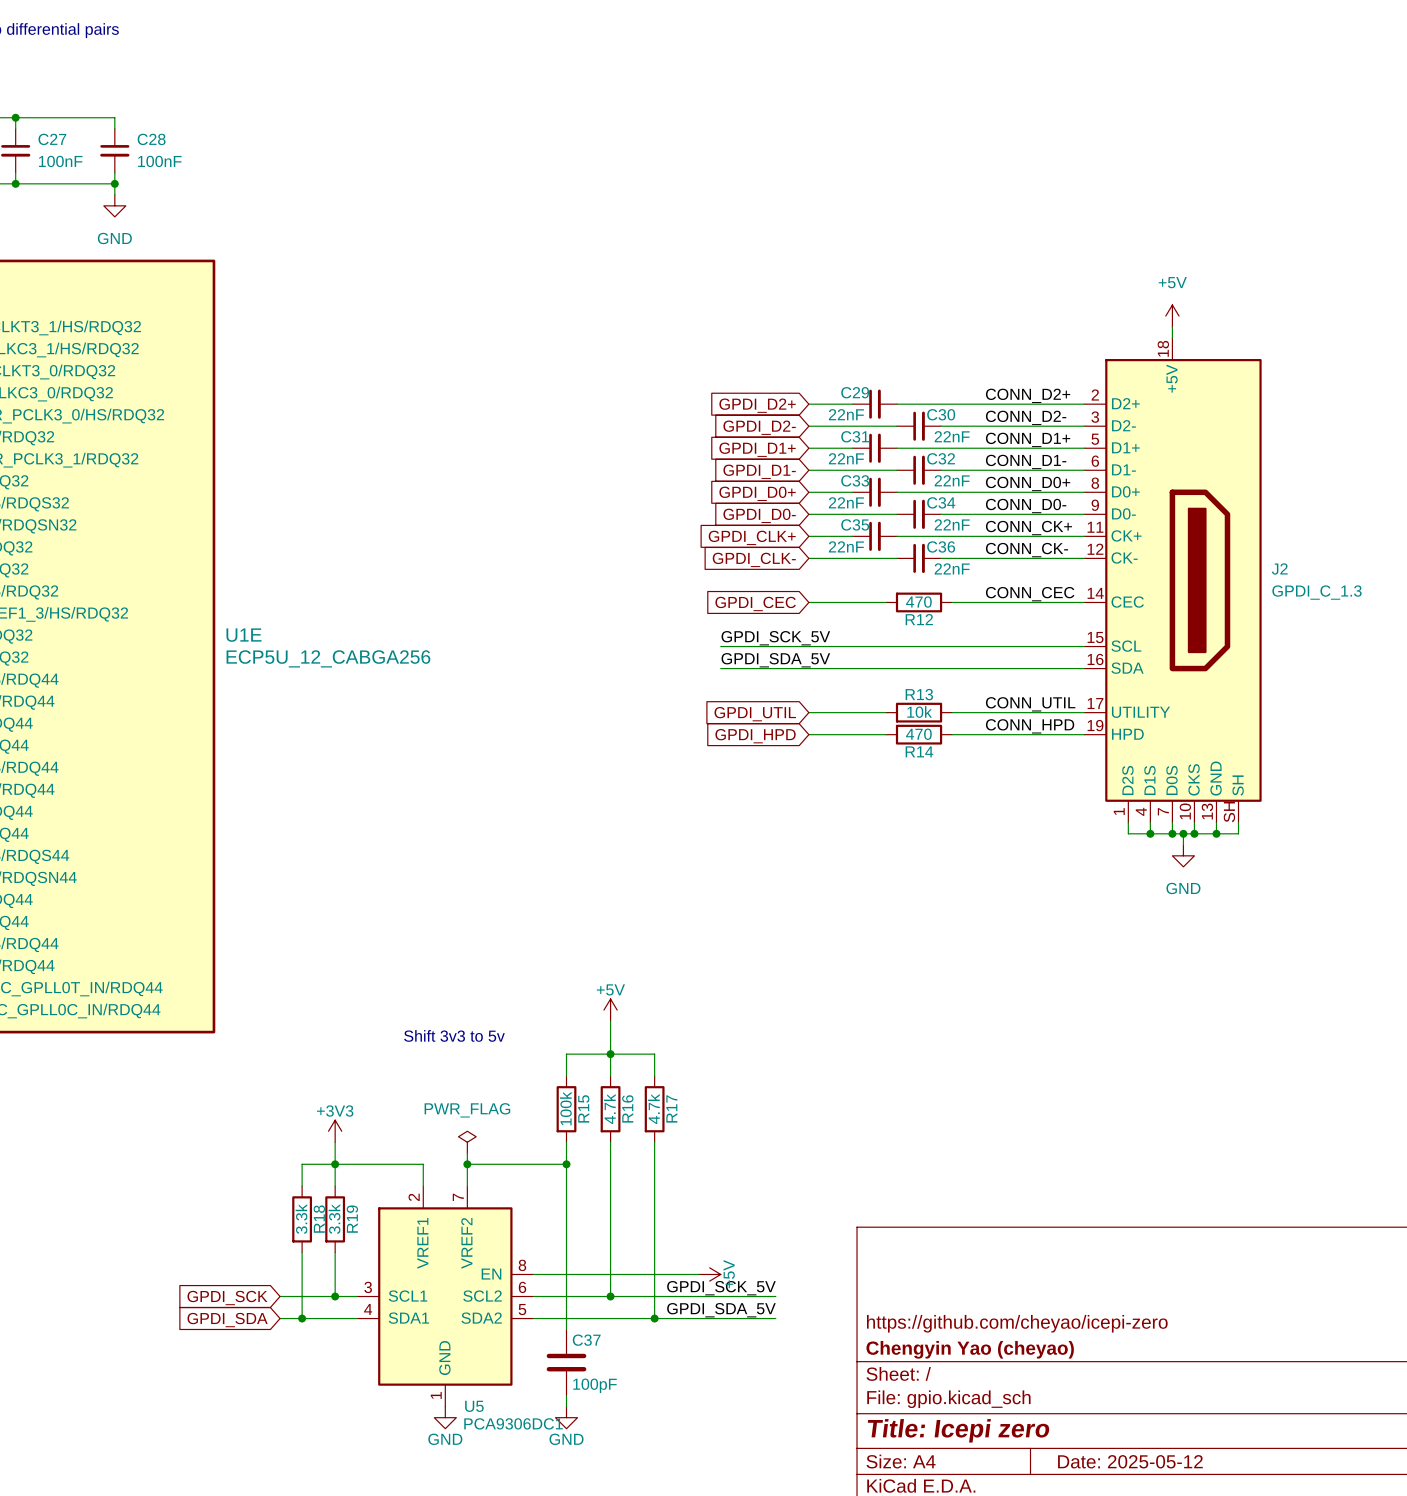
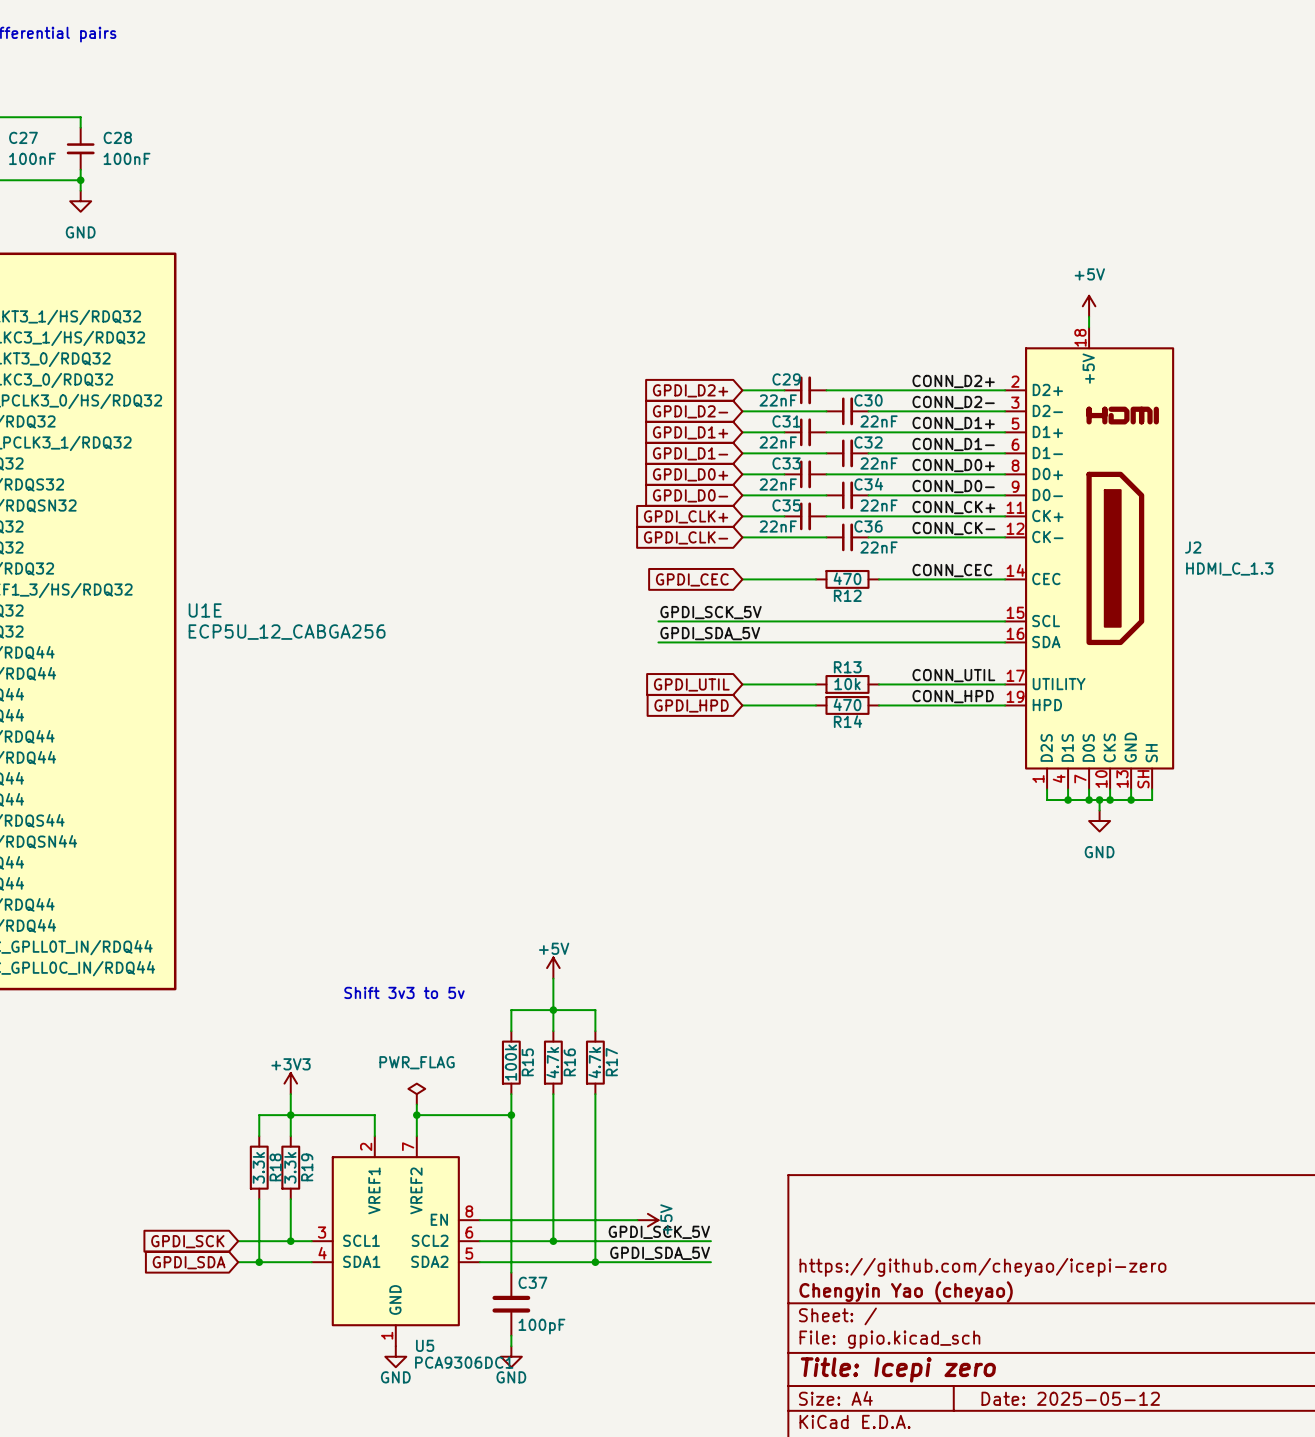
J2 symbol: [1084, 338, 1262, 823] -> [1005, 327, 1175, 790]
J2 value: GPDI_C_1.3 (1317, 592) -> HDMI_C_1.3 (1229, 569)

